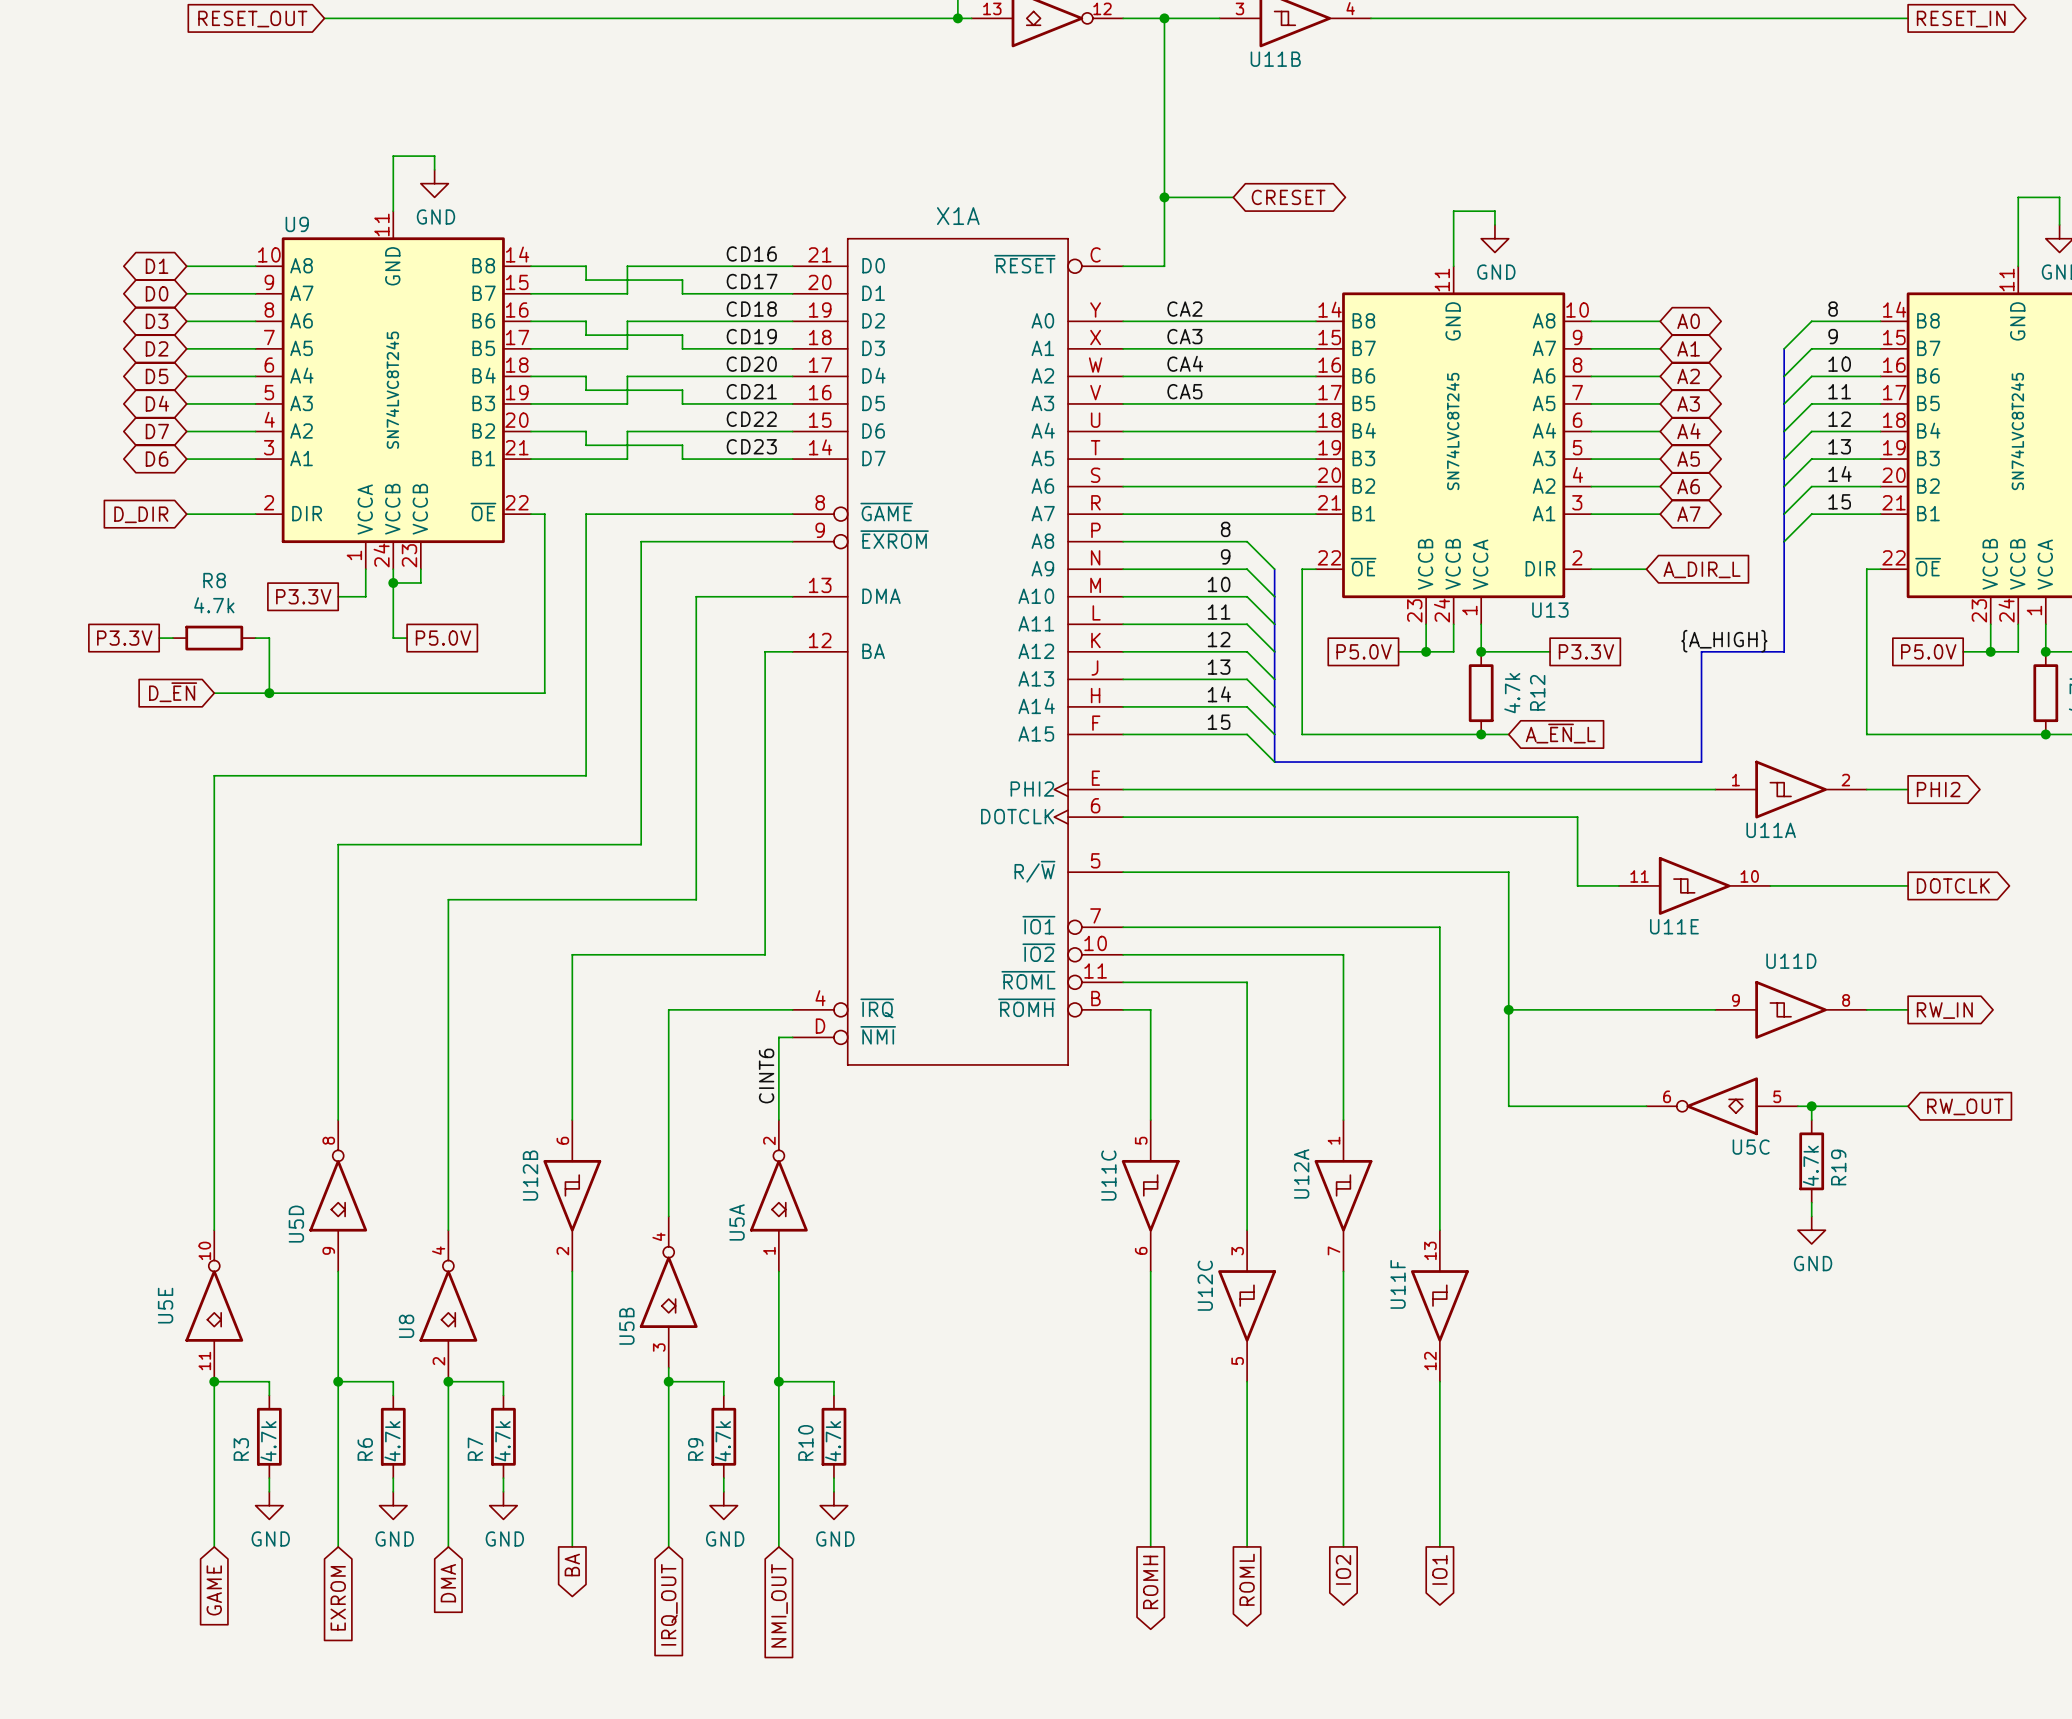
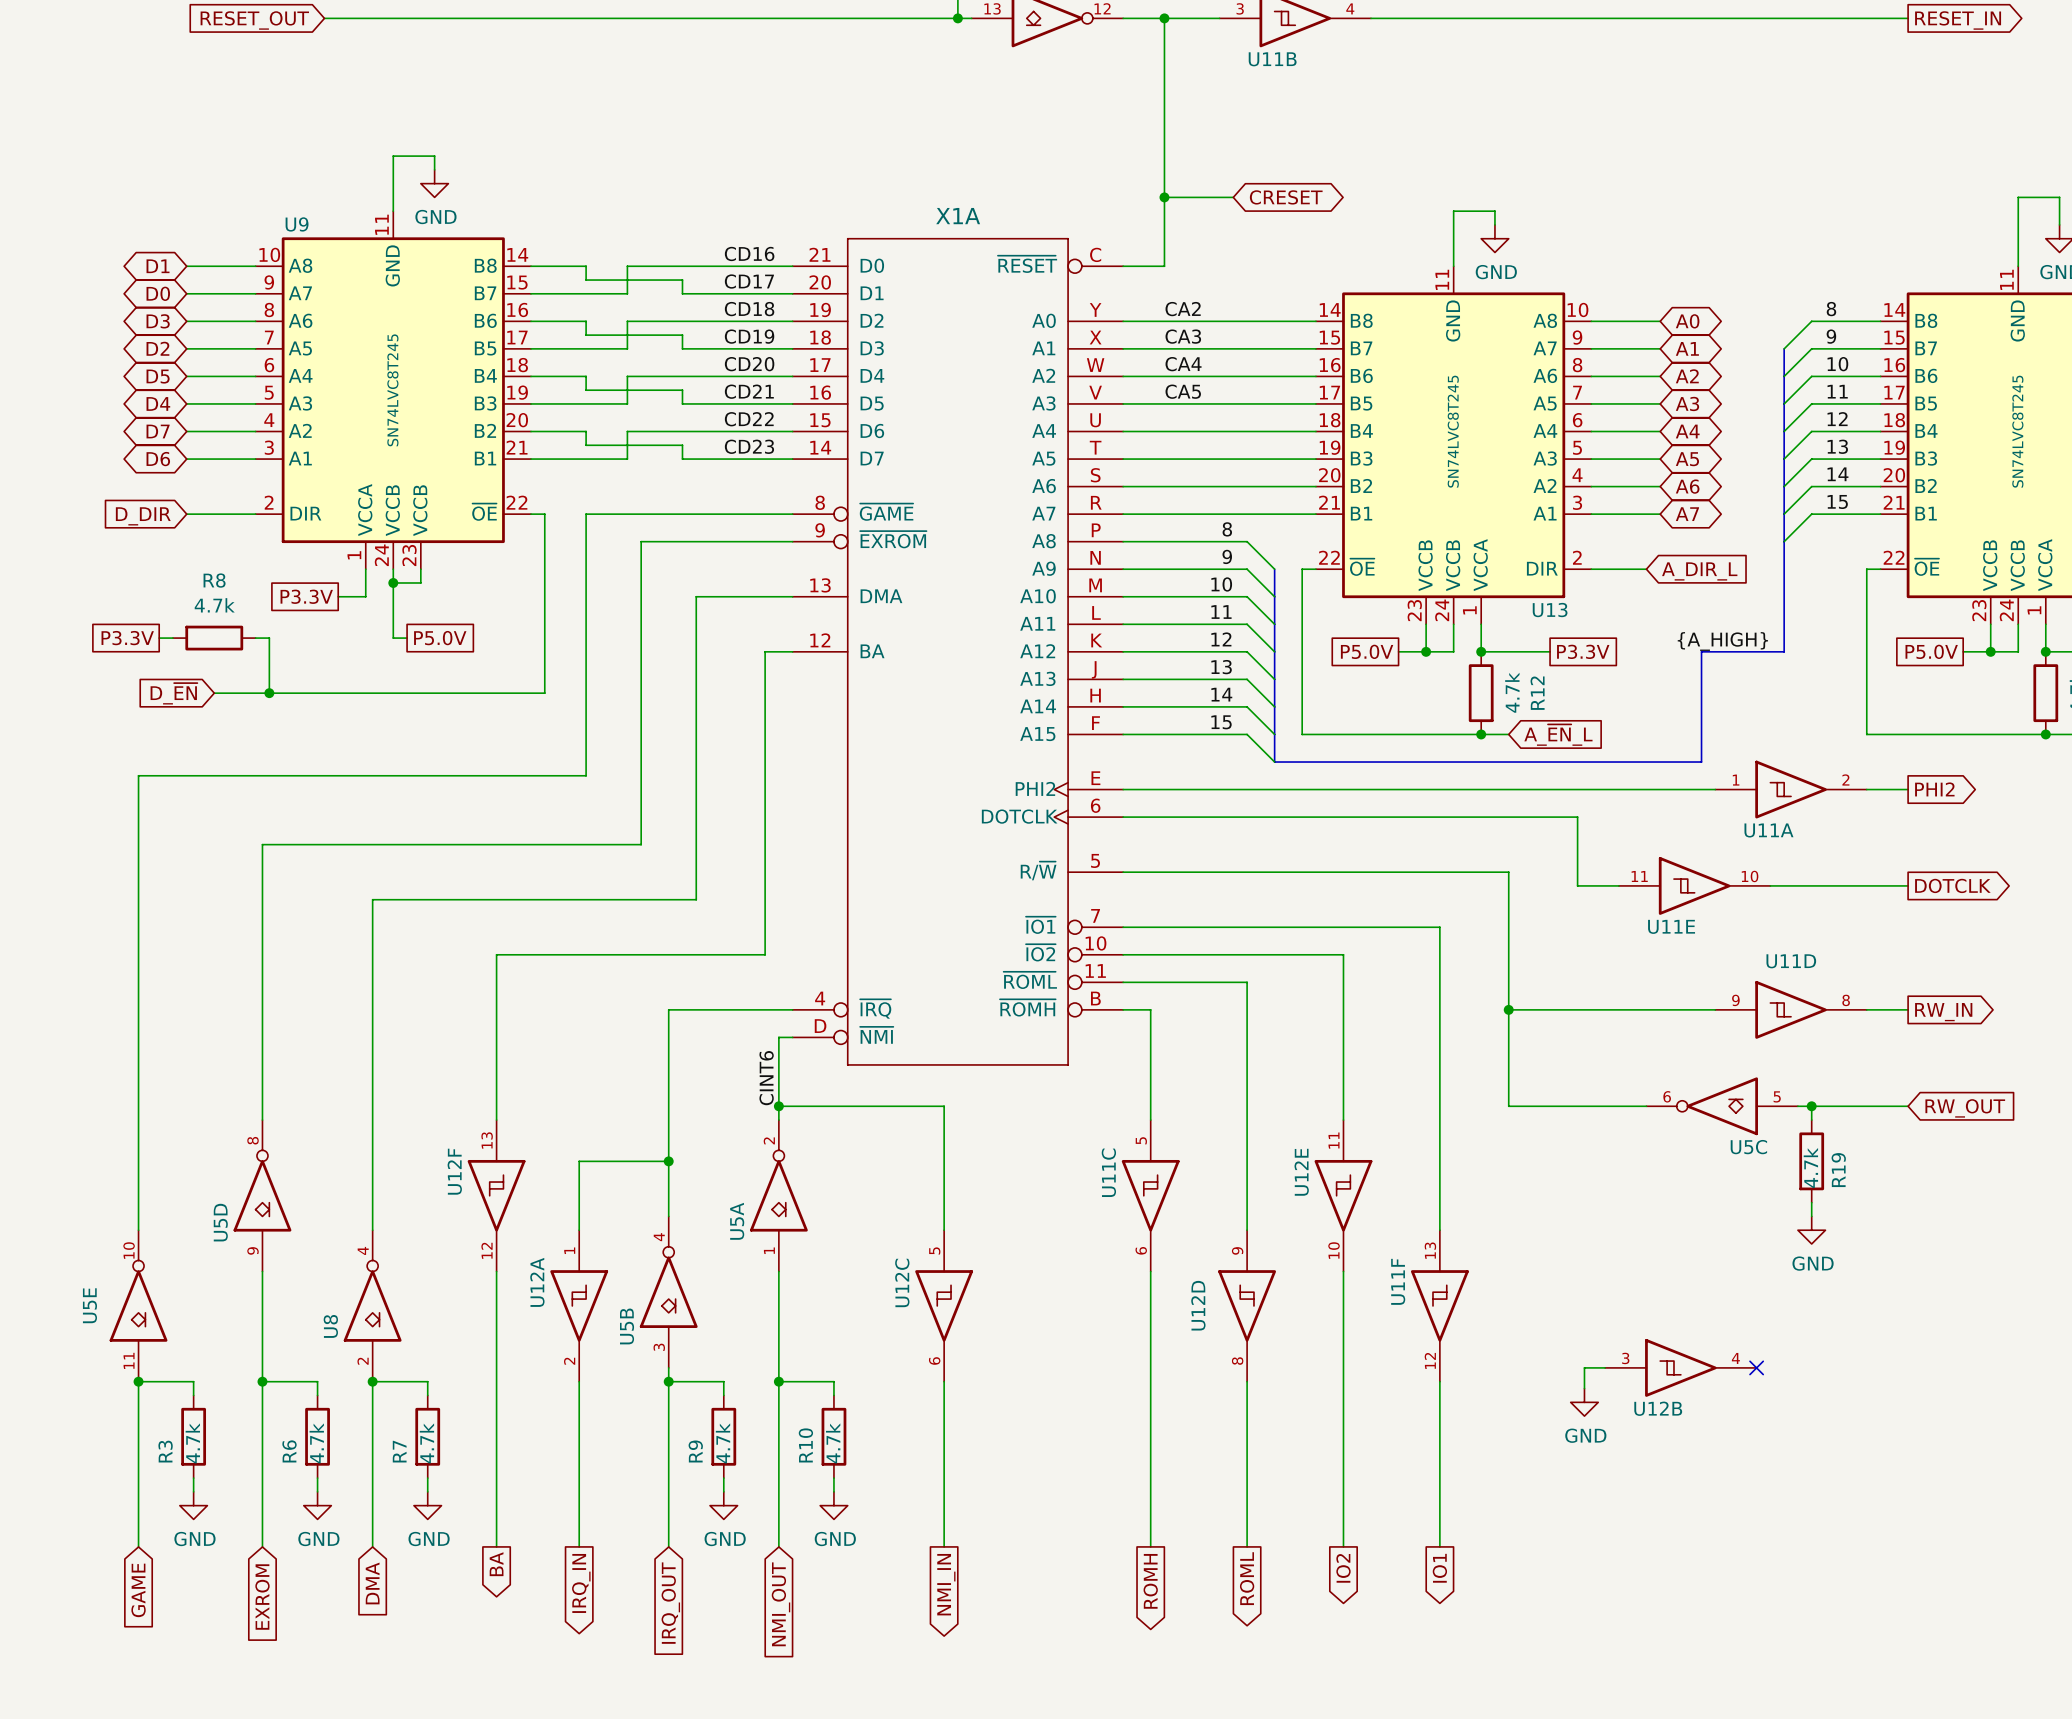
wire: (214, 775) (214, 1230) -> (214, 775) (138, 775) (138, 1230)
wire: (338, 844) (338, 1120) -> (338, 844) (262, 844) (262, 1120)
wire: (448, 899) (448, 1230) -> (448, 899) (372, 899) (372, 1230)
wire: (572, 954) (572, 1120) -> (572, 954) (496, 954) (496, 1120)
wire: none -> (778, 1106) (944, 1106) (944, 1230)
junction: none -> (778, 1106)
U12B symbol: [543, 1120, 602, 1272] -> [1605, 1339, 1757, 1397]
wire: none -> (668, 1161) (579, 1161) (579, 1230)
junction: none -> (668, 1161)
U12B name position: U12B (530, 1175) -> U12B (1658, 1408)
U5D position: (338, 1195) -> (262, 1195)
U12F: none -> (496, 1195)
U12A position: (1343, 1195) -> (579, 1305)
U12E: none -> (1343, 1195)
U12A pin number: 7 (1334, 1250) -> 2 (569, 1361)
U12C pin number: 3 (1237, 1251) -> 5 (934, 1250)
wire: (338, 1271) (338, 1546) -> (262, 1271) (262, 1546)
wire: (572, 1271) (572, 1546) -> (496, 1271) (496, 1546)
U5E position: (214, 1305) -> (138, 1305)
U8 position: (448, 1305) -> (372, 1305)
U12C position: (1247, 1305) -> (944, 1305)
U12D: none -> (1247, 1305)
U12C pin number: 5 (1237, 1361) -> 6 (934, 1360)
wire: none -> (1605, 1367) (1584, 1367) (1584, 1388)
no-connect mark: none -> (1756, 1367)
junction: none -> (138, 1381)
junction: (214, 1381) -> none
wire: (262, 1381) (214, 1381) (214, 1546) -> none
junction: none -> (262, 1381)
wire: (269, 1381) (269, 1395) -> (269, 1381) (317, 1381) (317, 1395)
wire: (338, 1381) (372, 1381) -> (372, 1546) (372, 1381)
junction position: (338, 1381) -> (372, 1381)
wire: (393, 1381) (393, 1395) -> (393, 1381) (427, 1381) (427, 1395)
junction: (448, 1381) -> none
wire: none -> (579, 1381) (579, 1546)
wire: none -> (944, 1381) (944, 1546)
wire: none -> (193, 1395) (193, 1381) (138, 1381) (138, 1546)
wire: (503, 1395) (503, 1381) (448, 1381) (448, 1546) -> none
power symbol: none -> GND (1584, 1402)
R3 position: (269, 1436) -> (193, 1436)
R6 position: (393, 1436) -> (317, 1436)
R7 position: (503, 1436) -> (427, 1436)
wire: (269, 1478) (269, 1491) -> (193, 1478) (193, 1491)
wire: (393, 1478) (393, 1491) -> (317, 1478) (317, 1491)
wire: (503, 1478) (503, 1491) -> (427, 1478) (427, 1491)
power symbol: none -> GND (193, 1505)
power symbol: GND (269, 1505) -> none
power symbol: none -> GND (317, 1505)
power symbol position: GND (393, 1505) -> GND (427, 1505)
power symbol: GND (503, 1505) -> none
global label position: BA (572, 1565) -> BA (496, 1564)
global label position: DMA (448, 1583) -> DMA (372, 1583)
global label: none -> IRQ_IN (581, 1583)
global label: none -> NMI_IN (946, 1584)
global label position: GAME (214, 1590) -> GAME (138, 1590)
global label position: EXROM (338, 1598) -> EXROM (262, 1597)

